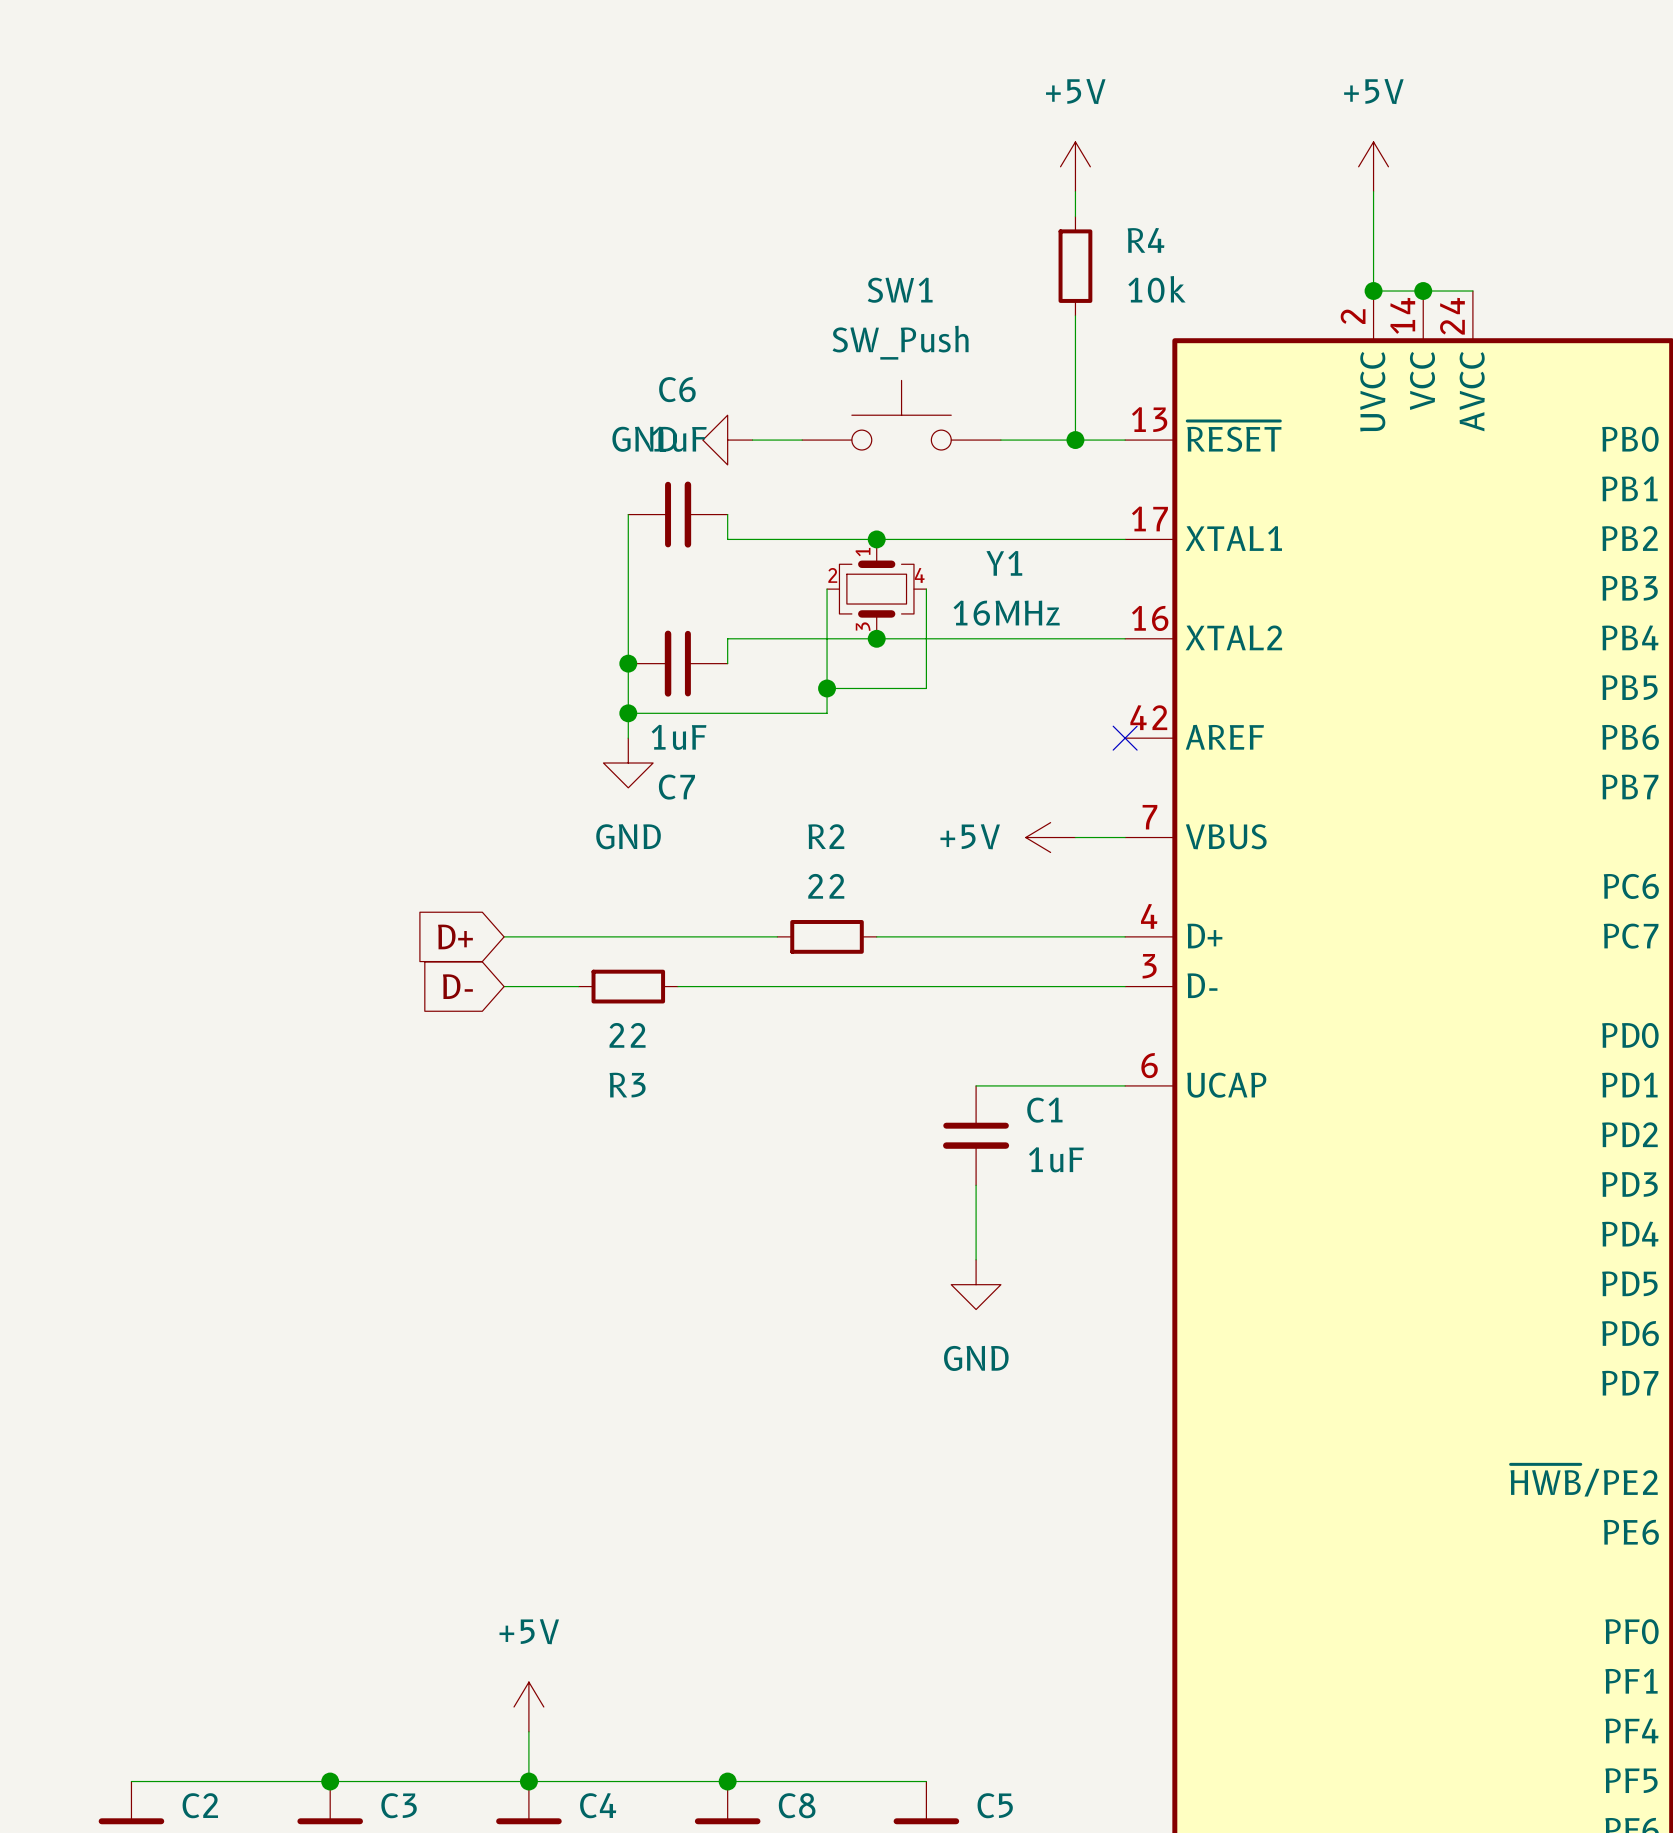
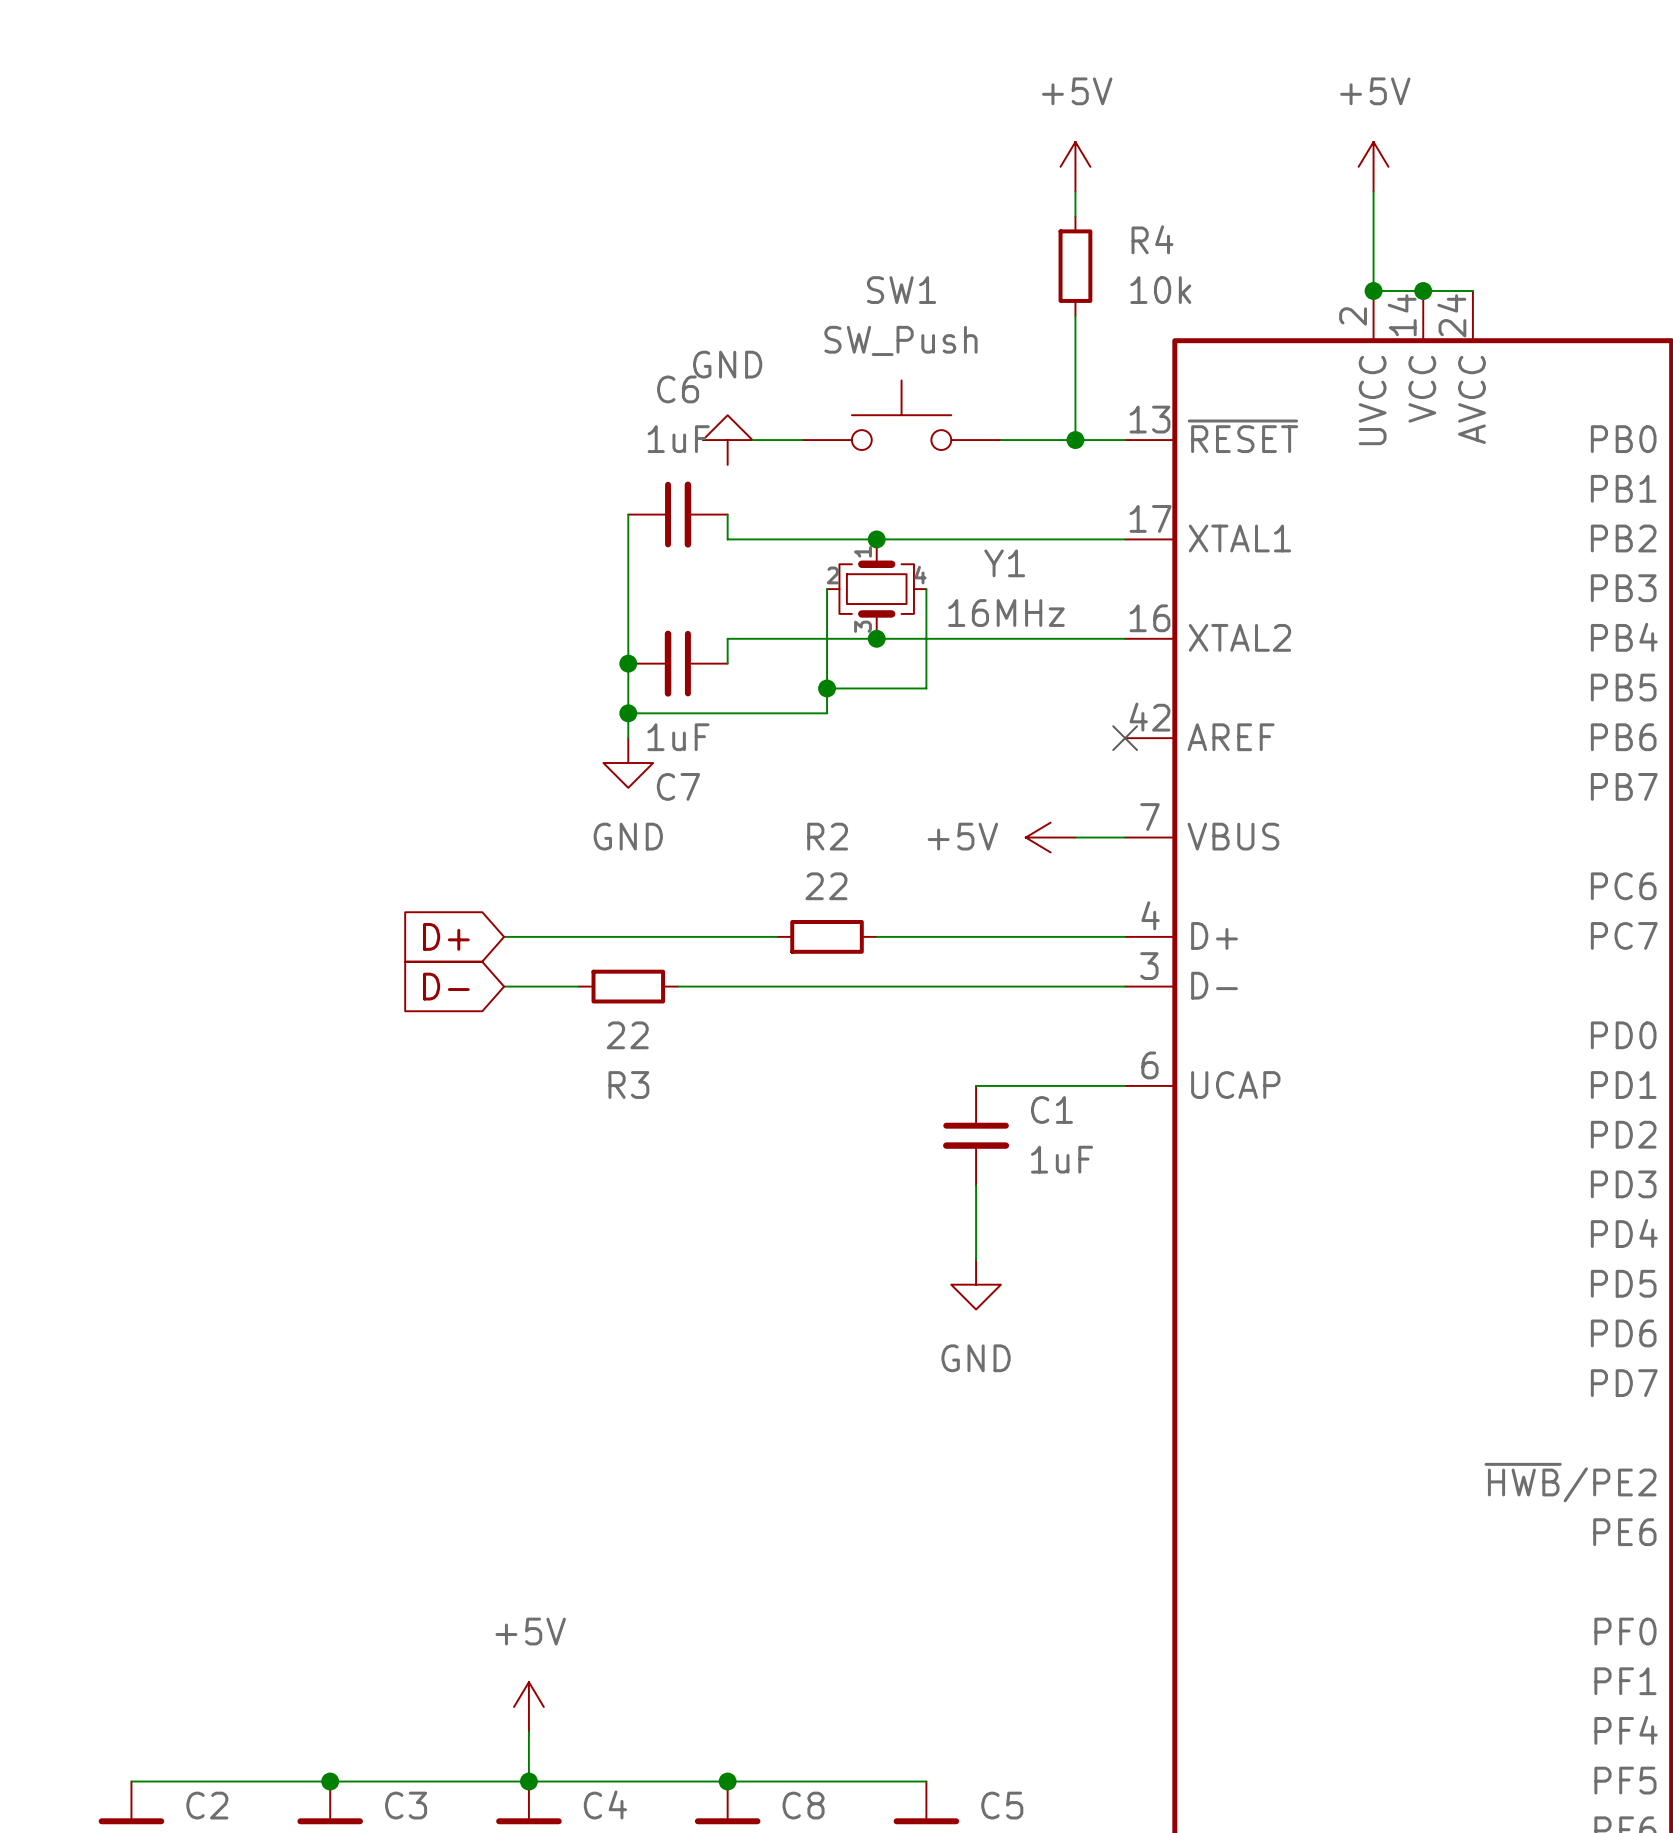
power symbol rotation: 0° (727, 440) -> 90° clockwise (727, 440)

